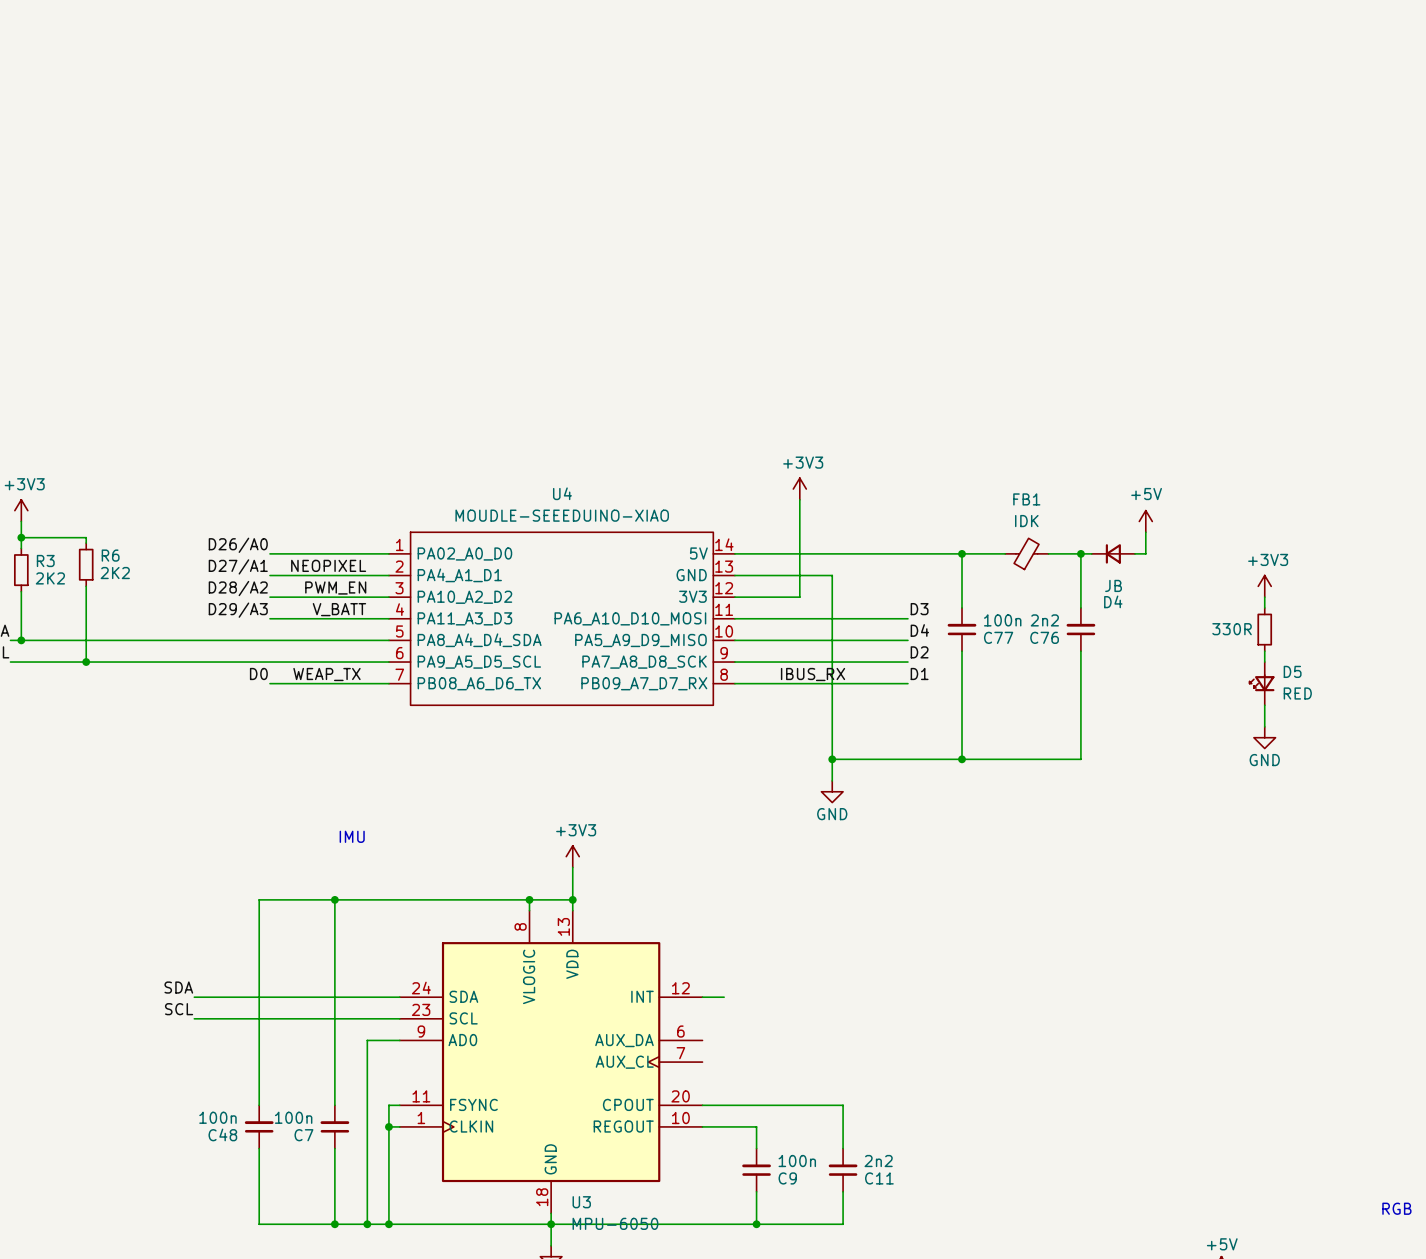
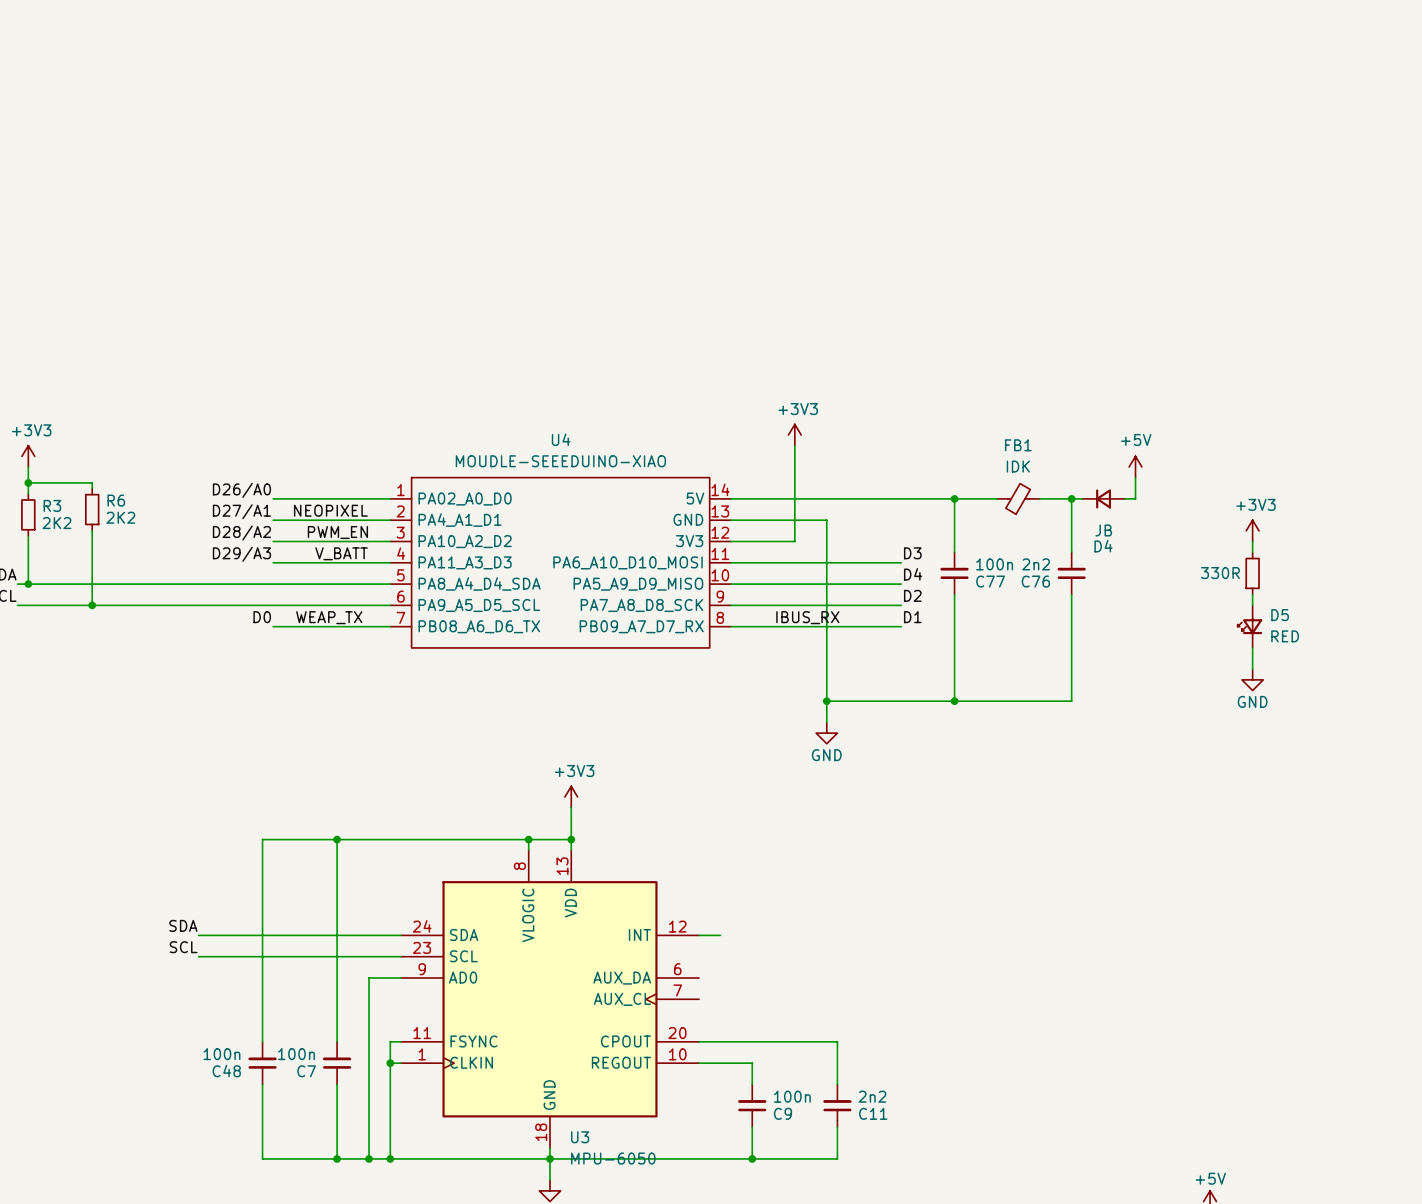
text: IMU (352, 836) -> none
text: RGB (1396, 1208) -> none

